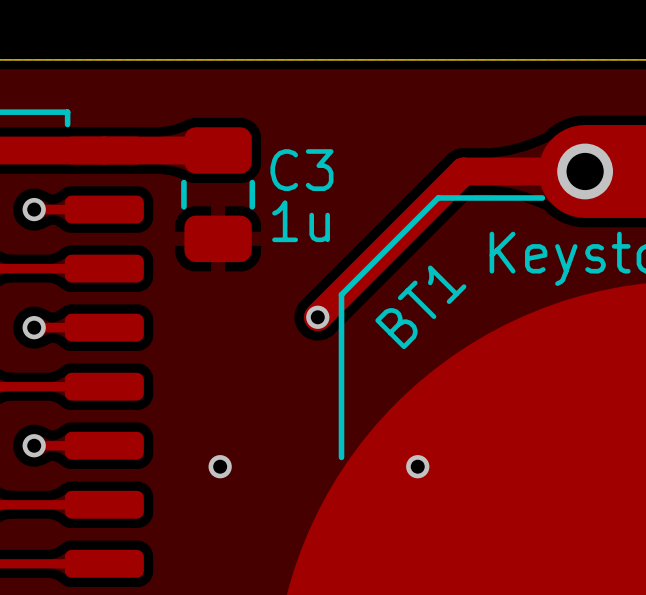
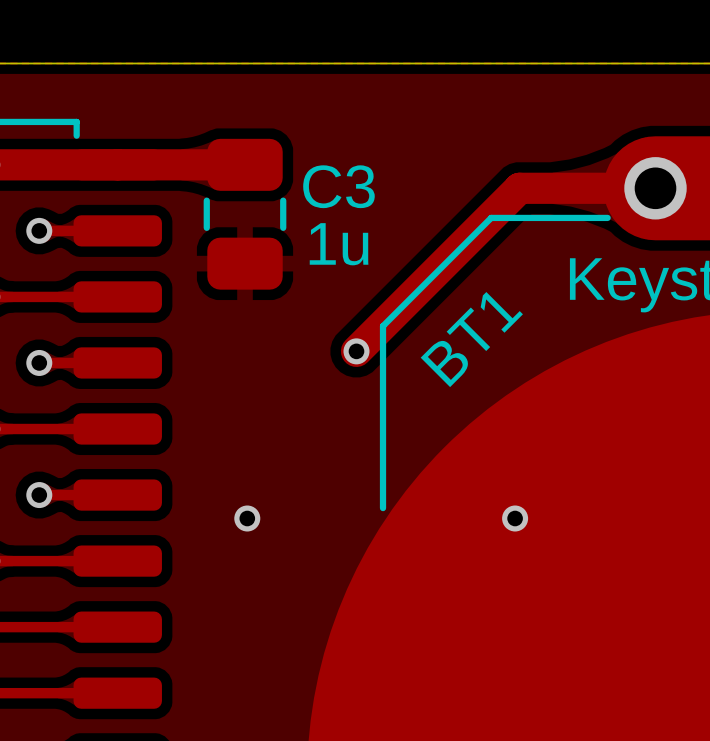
via position: (417, 466) -> (515, 518)

